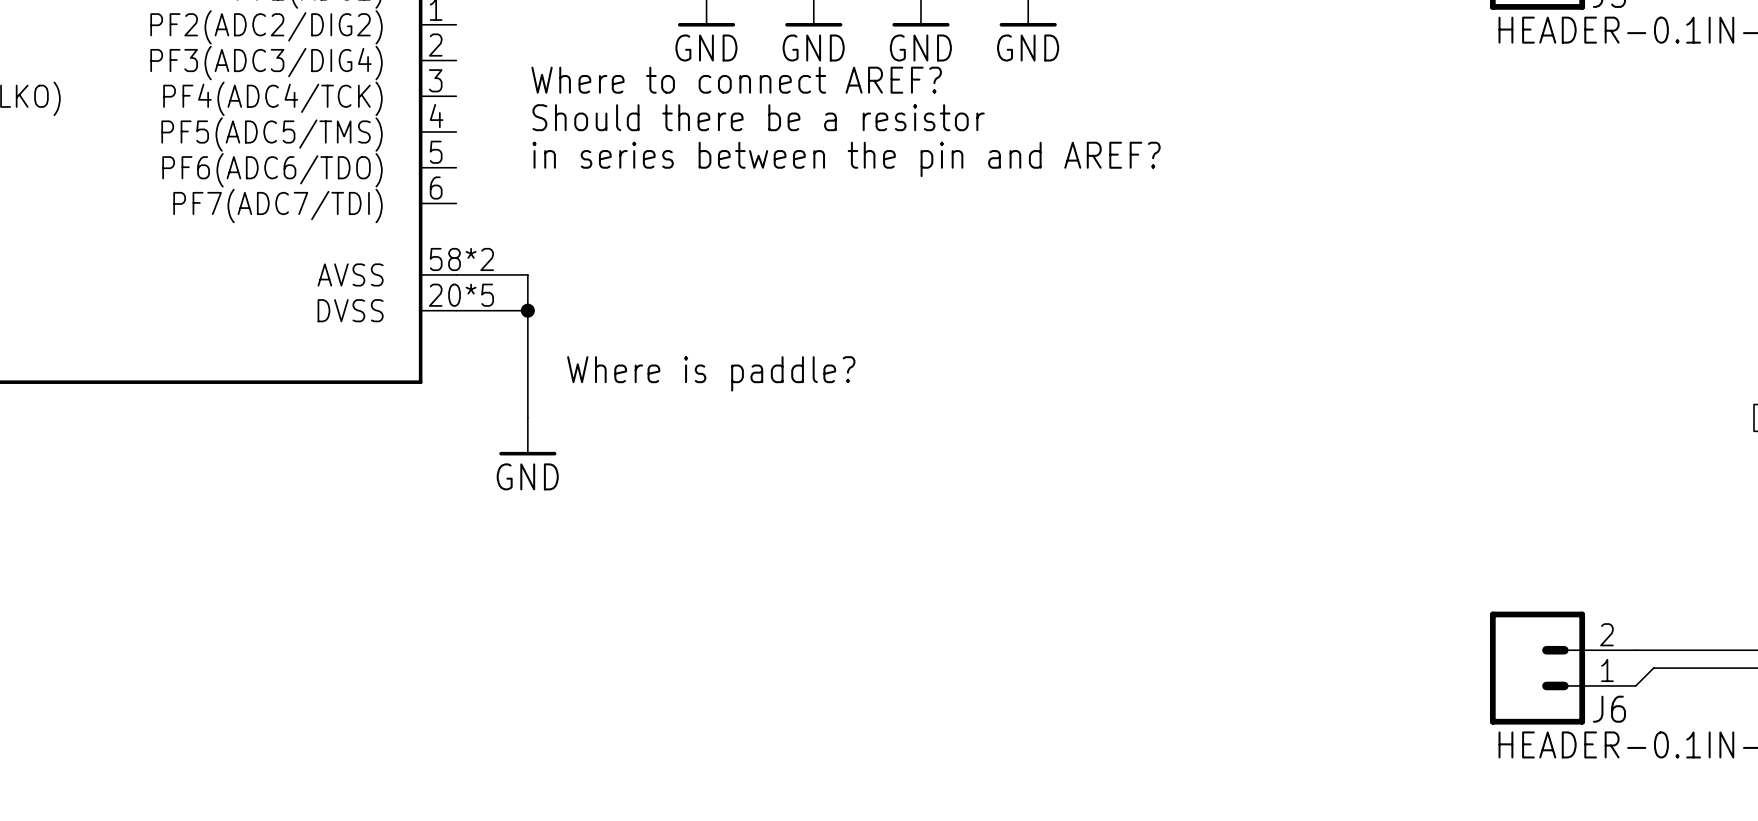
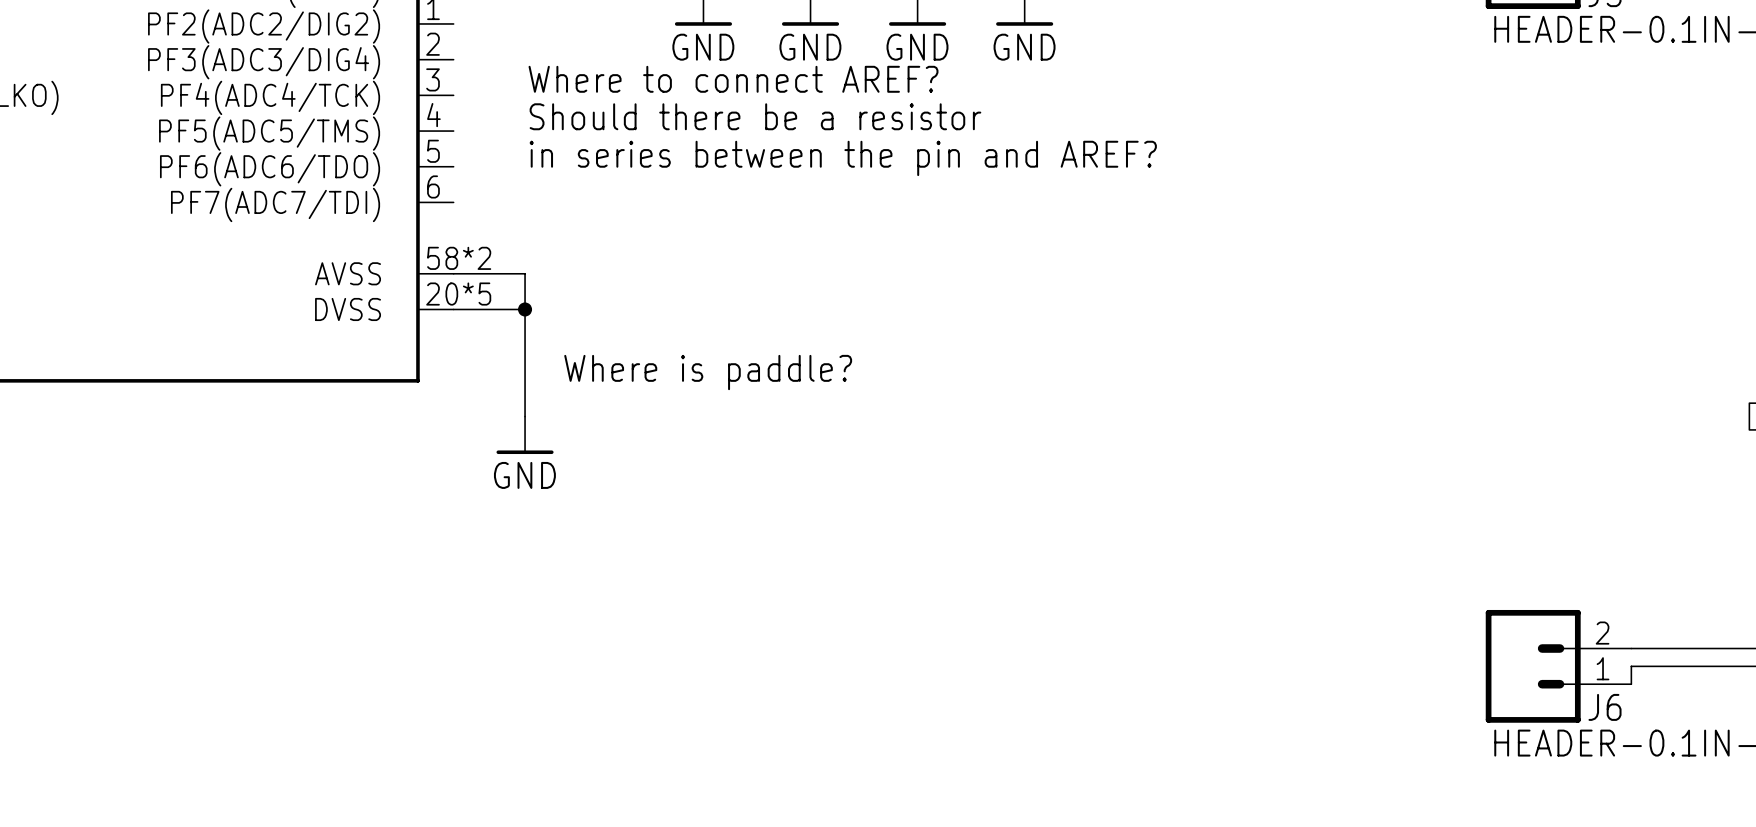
wire: (1653, 668) (1635, 685) -> (1649, 666) (1631, 666) (1631, 684)

